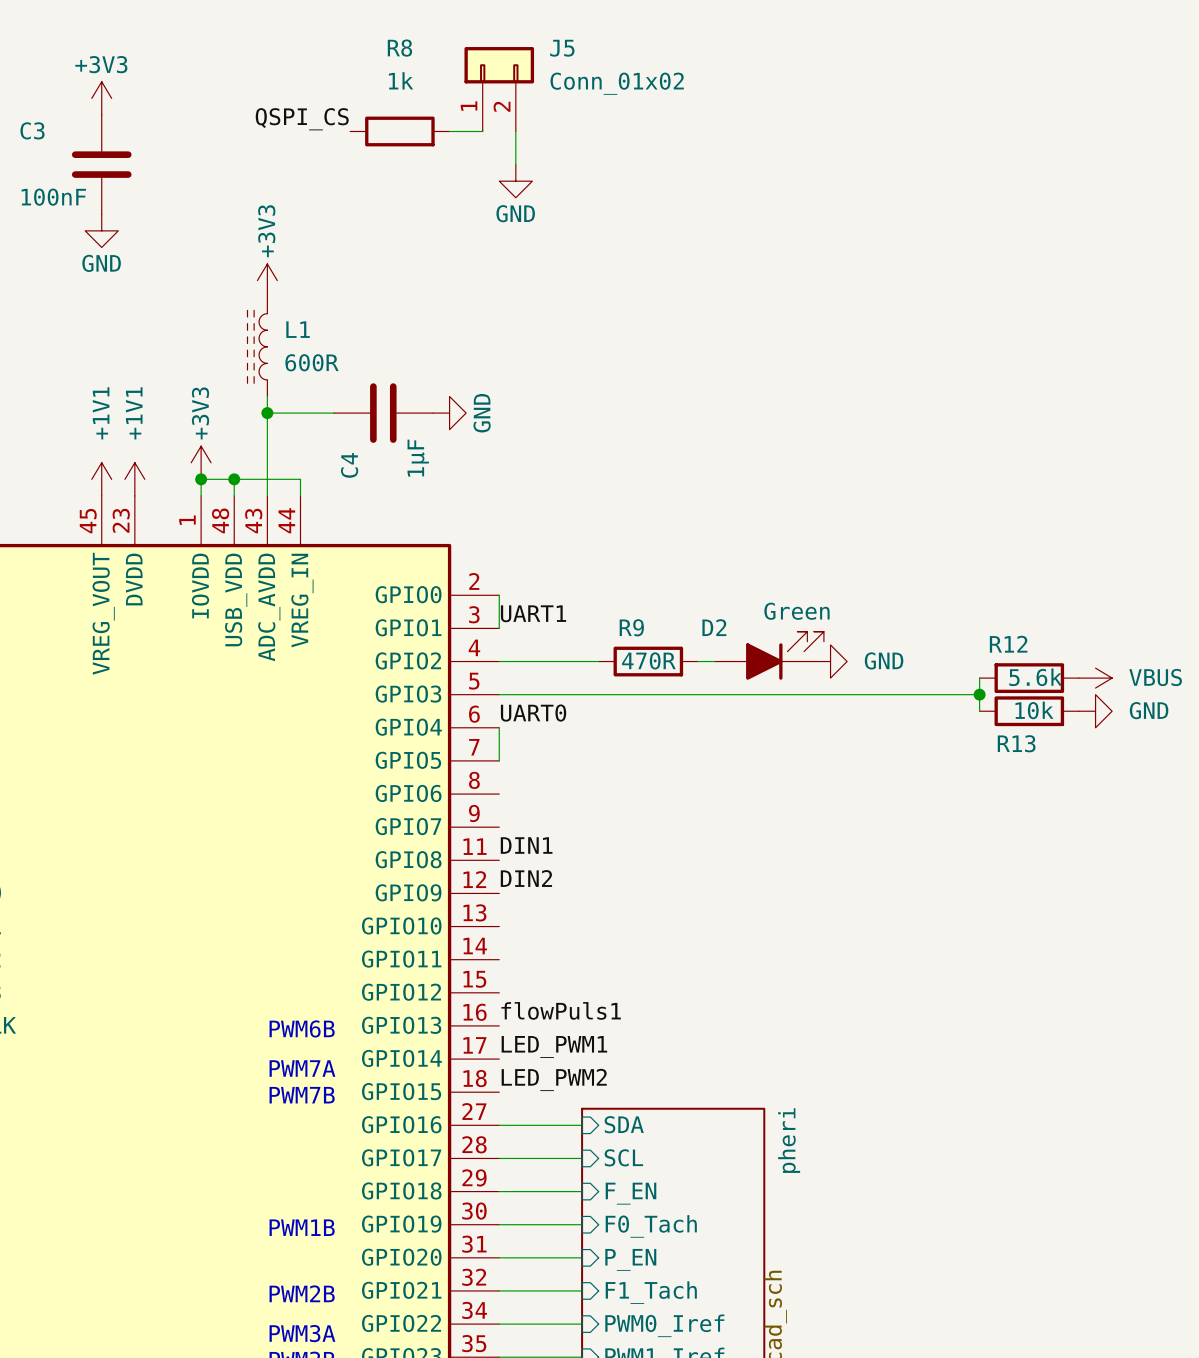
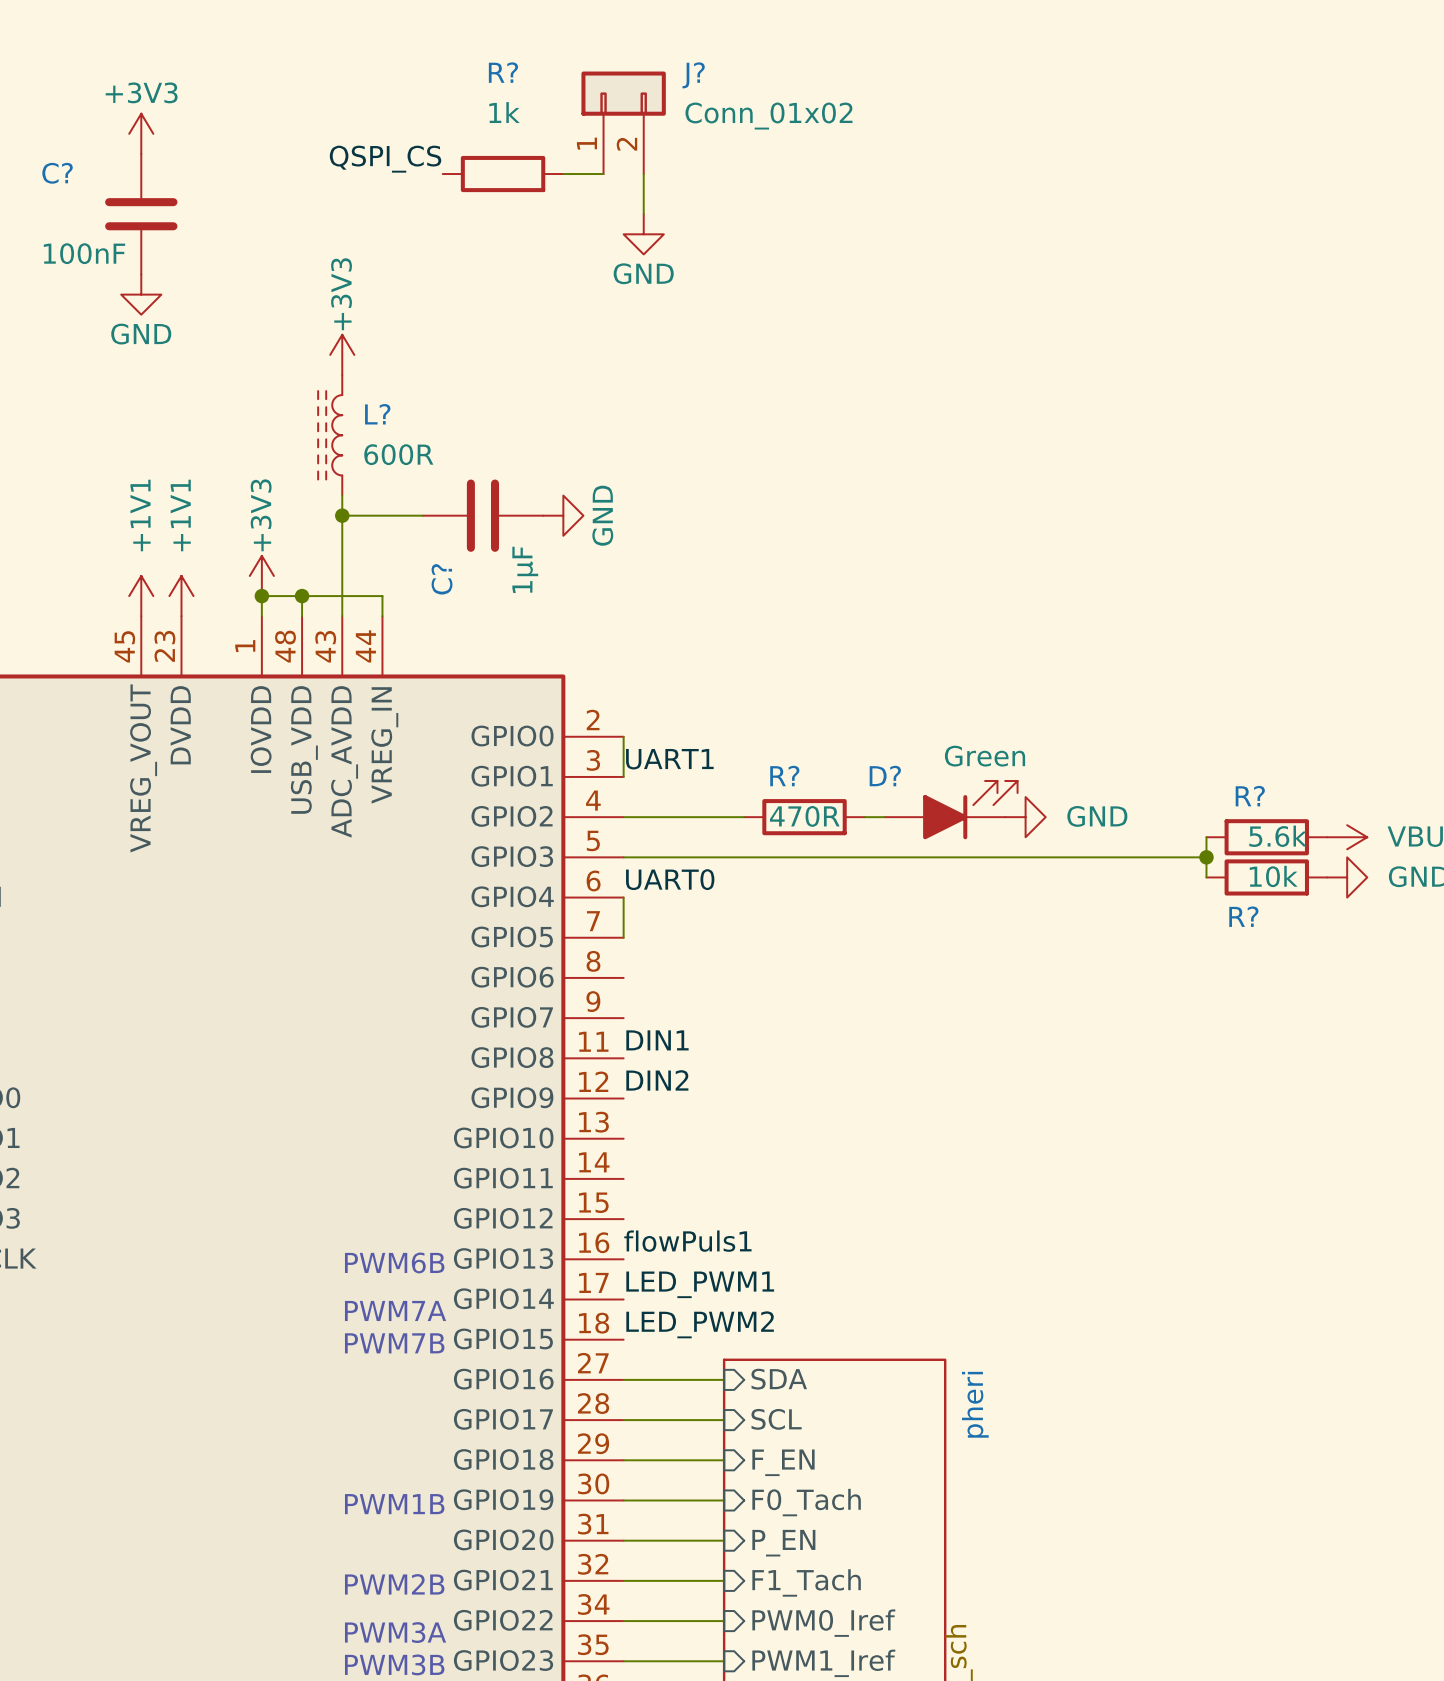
R8 name: R8 (399, 48) -> R? (503, 72)
J5 name: J5 (562, 48) -> J? (693, 75)
C3 name: C3 (32, 130) -> C? (57, 173)
L1 name: L1 (298, 329) -> L? (377, 414)
C4 name: C4 (349, 465) -> C? (442, 579)
R9 name: R9 (631, 627) -> R? (784, 776)
D2 name: D2 (714, 627) -> D? (885, 776)
R12 name: R12 (1008, 644) -> R? (1250, 796)
R13 name: R13 (1016, 743) -> R? (1243, 916)

